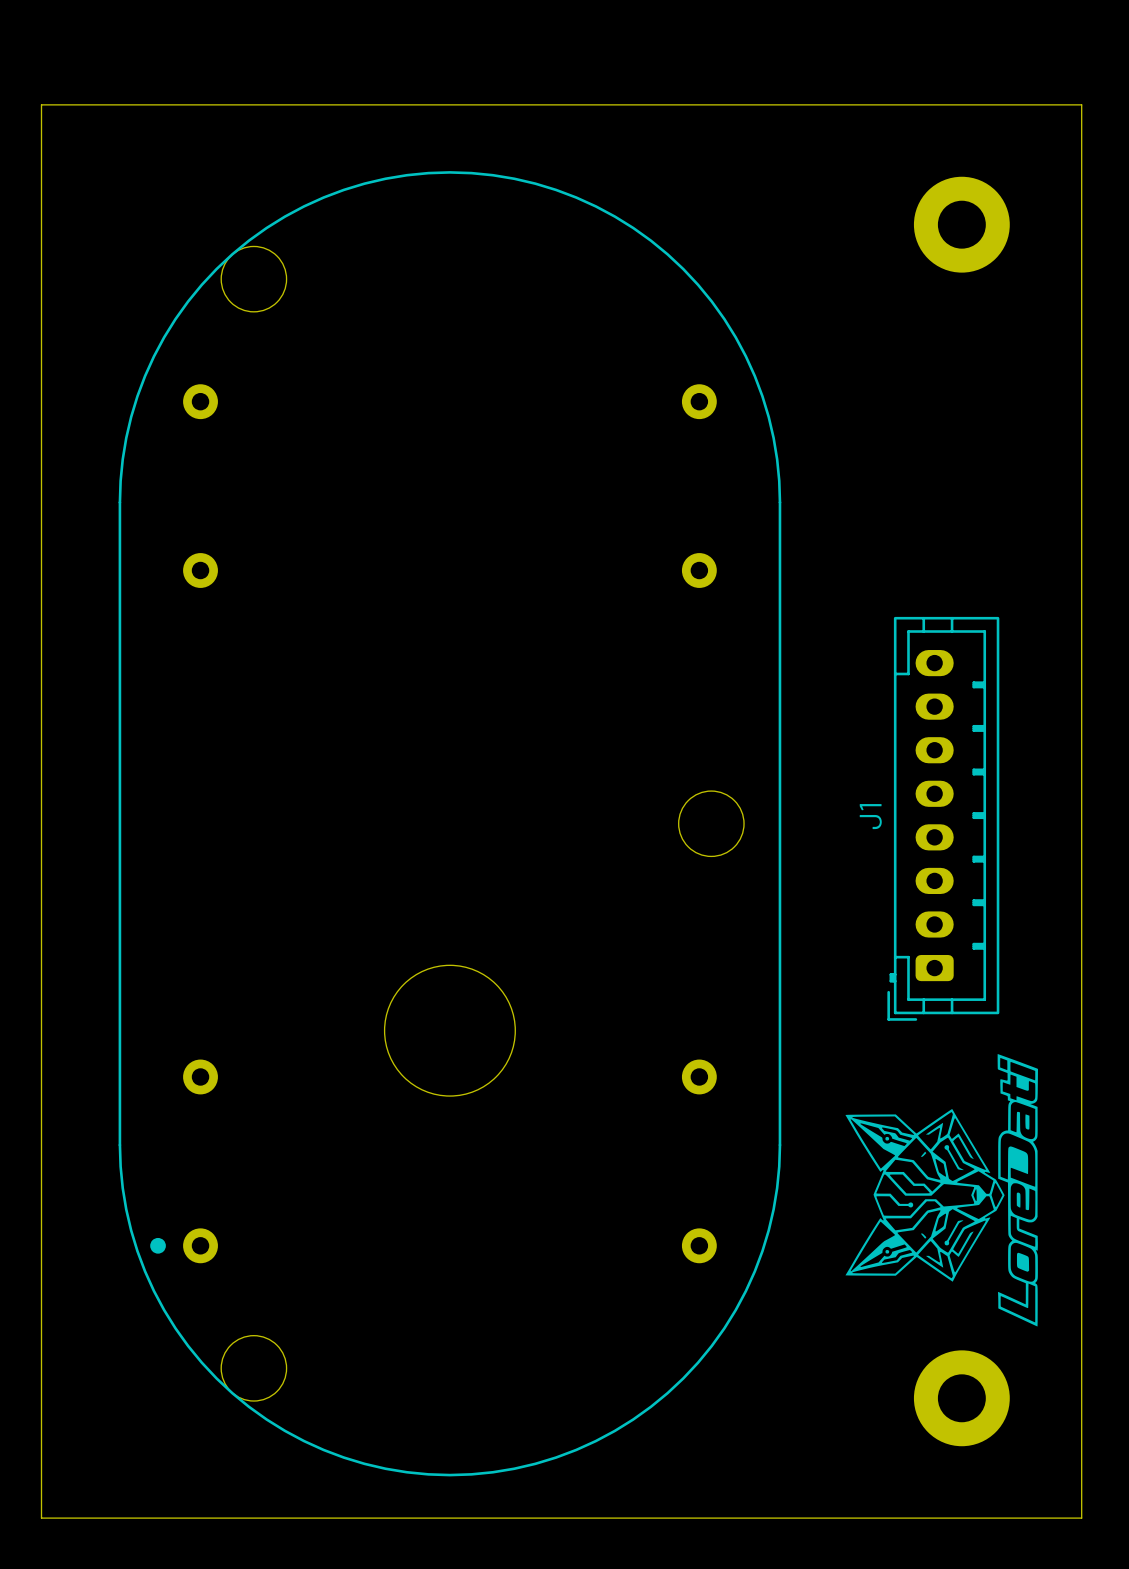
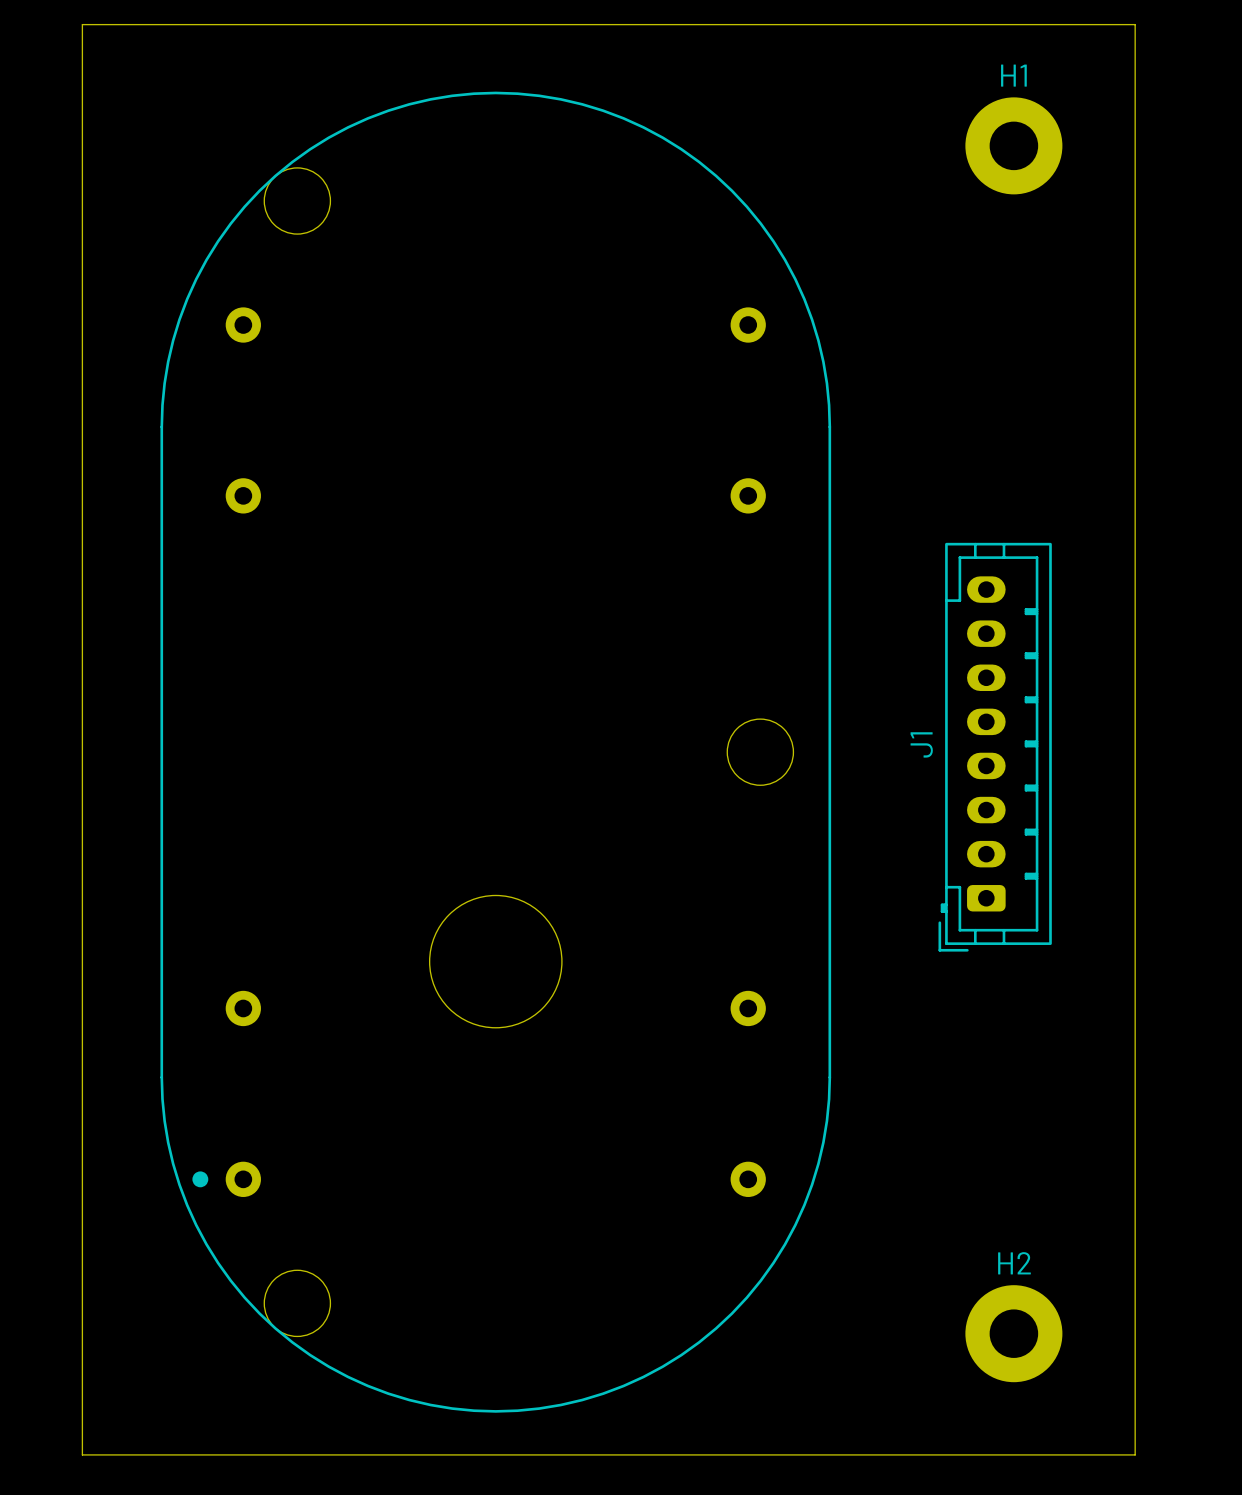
H1 name: none -> H1 (1013, 75)
drawing: [845, 1054, 1038, 1327] -> none
H2 name: none -> H2 (1014, 1263)

